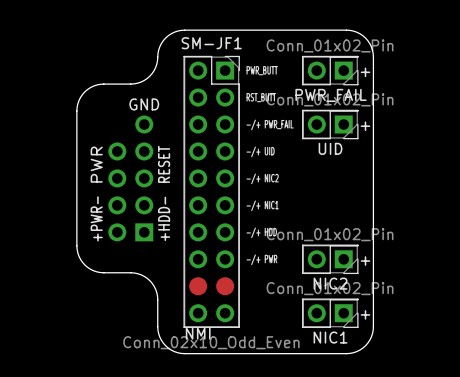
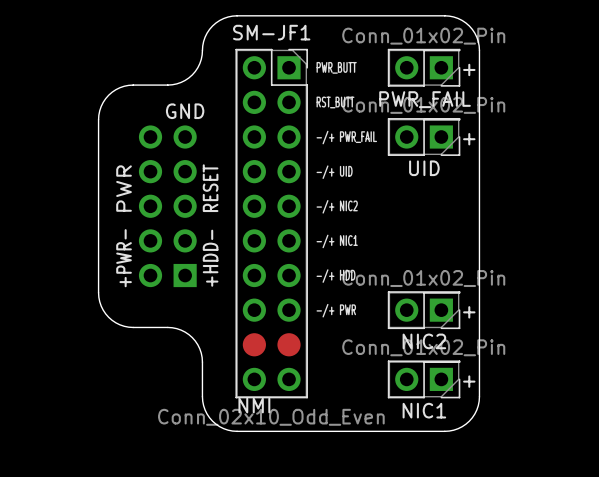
part footprint: [108, 115, 154, 242] -> [138, 125, 197, 288]

